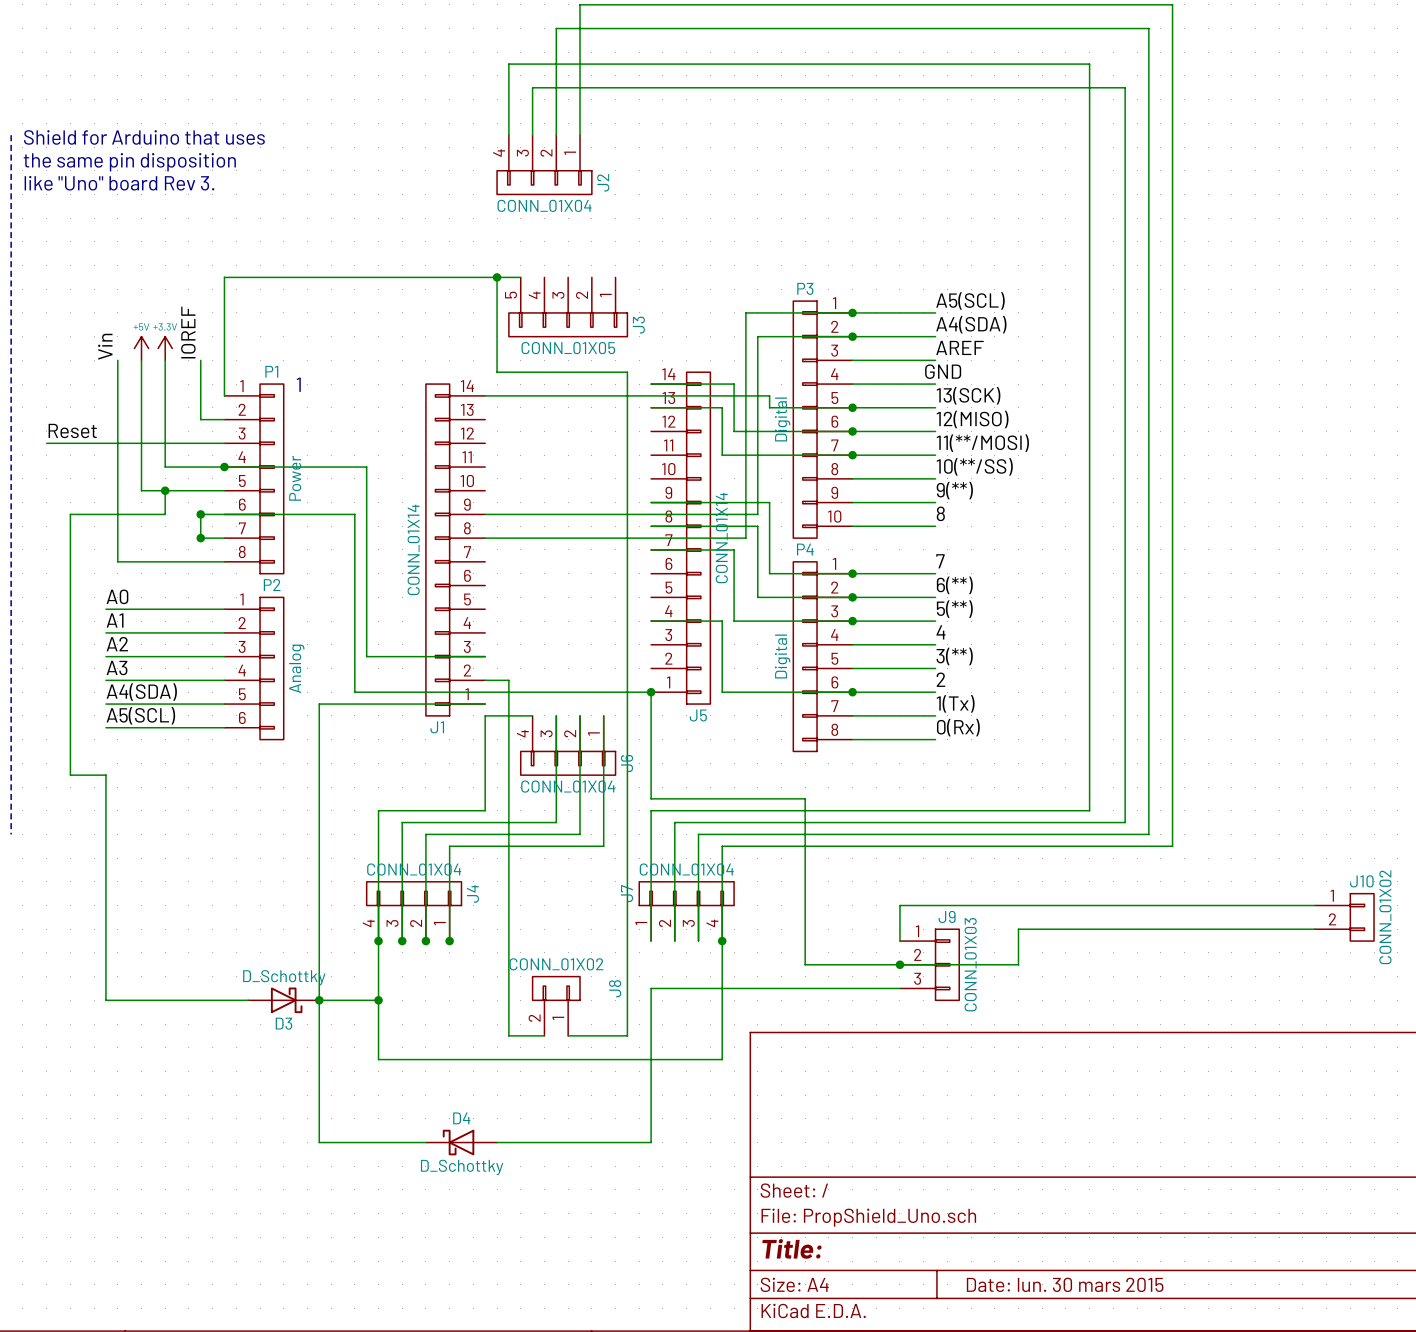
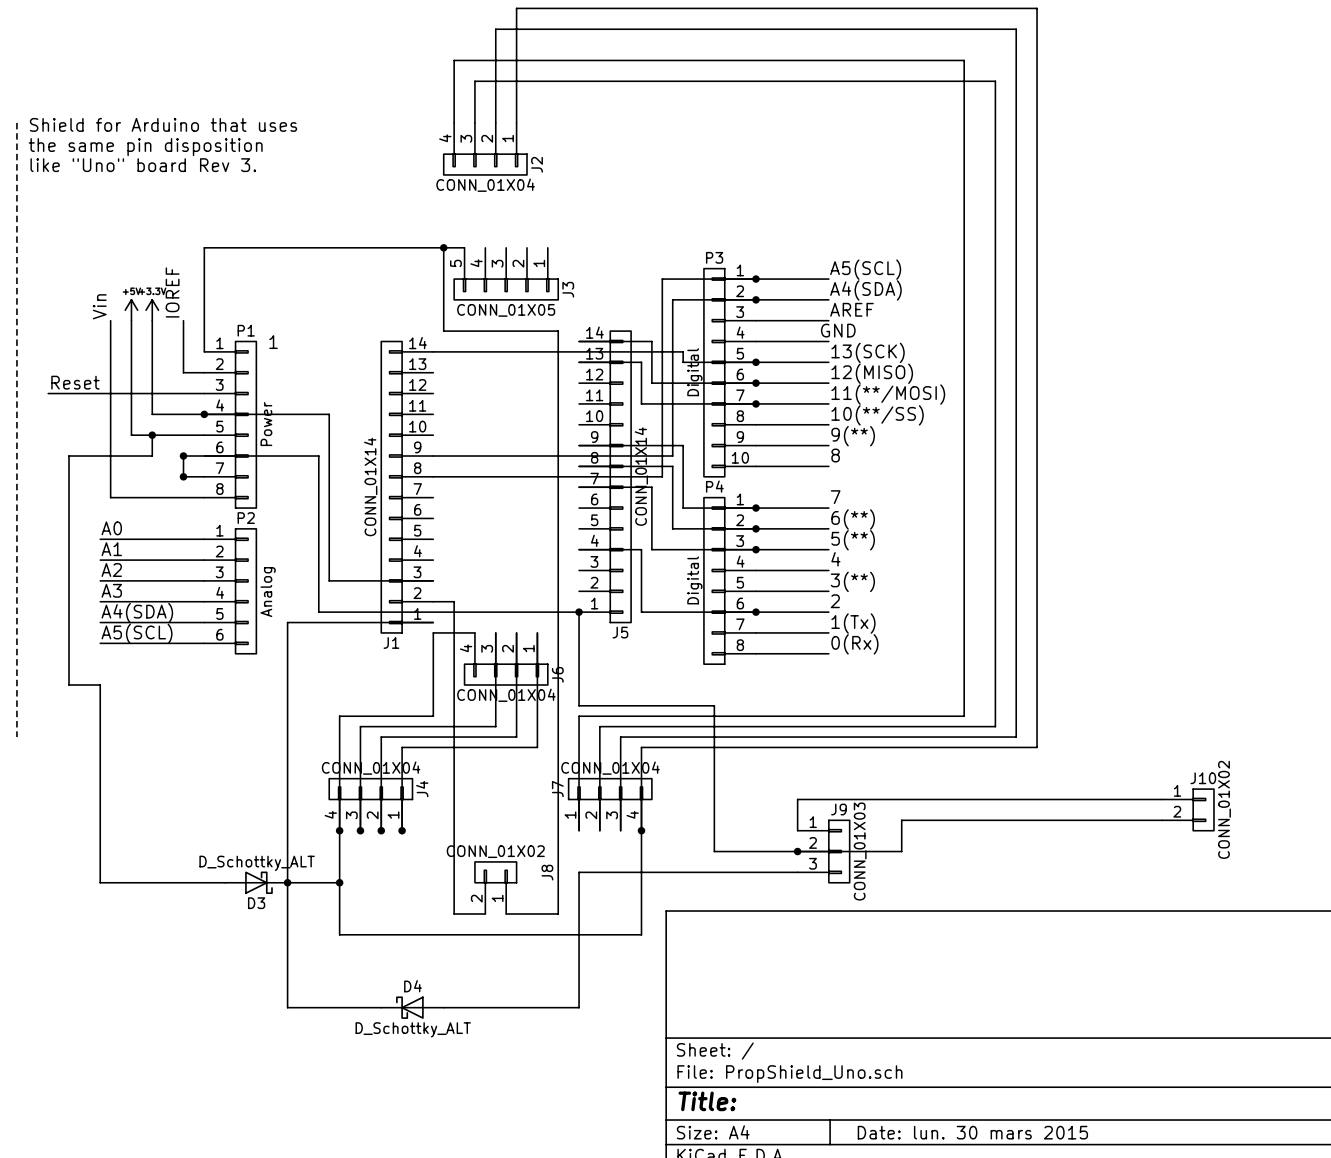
D3 value: D_Schottky (284, 977) -> D_Schottky_ALT (257, 863)
D4 value: D_Schottky (462, 1167) -> D_Schottky_ALT (413, 1029)

